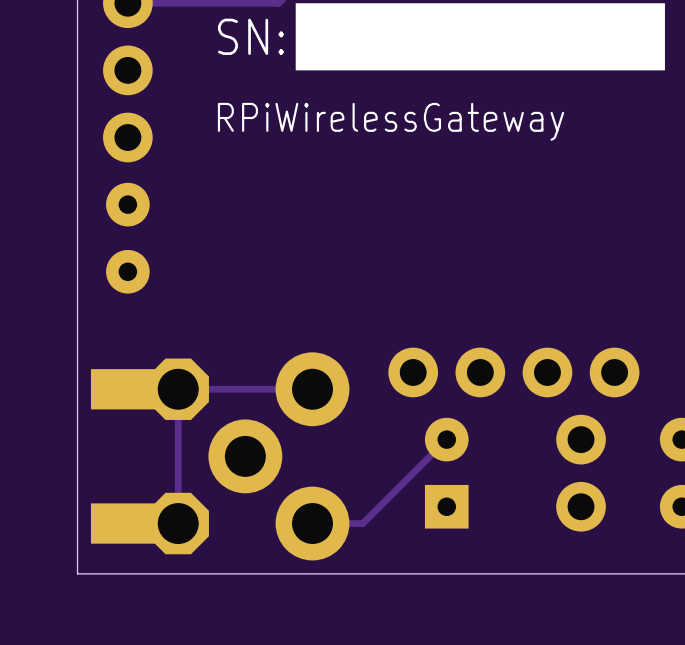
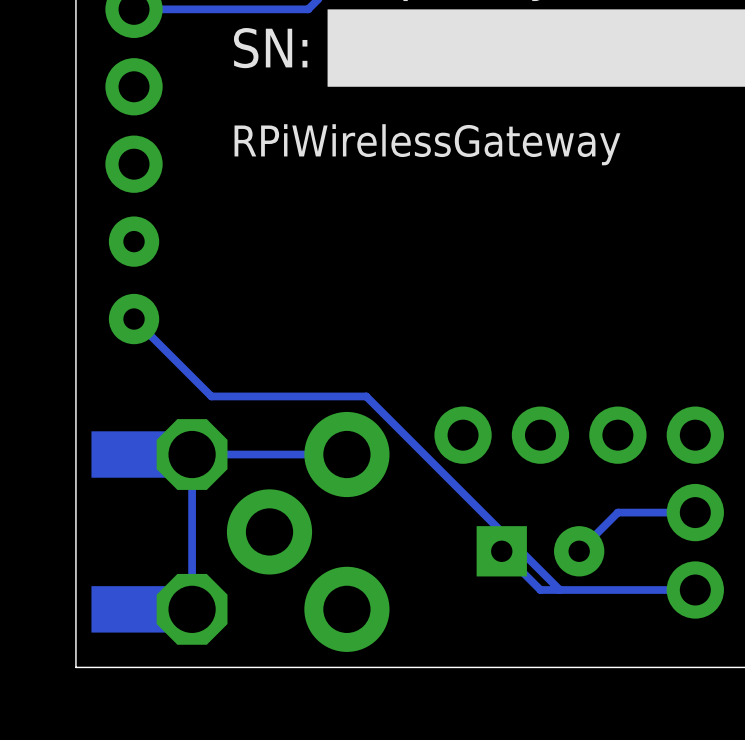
track: none -> (134, 319) (211, 396) (366, 396) (559, 590)
track: (446, 439) (362, 523) (312, 523) -> none
part position: (581, 439) -> (695, 512)
track: none -> (695, 512) (617, 512) (579, 551)
track: none -> (501, 551) (540, 590) (695, 590)
part rotation: 0° (446, 473) -> 90° clockwise (540, 551)
part position: (581, 506) -> (695, 590)

